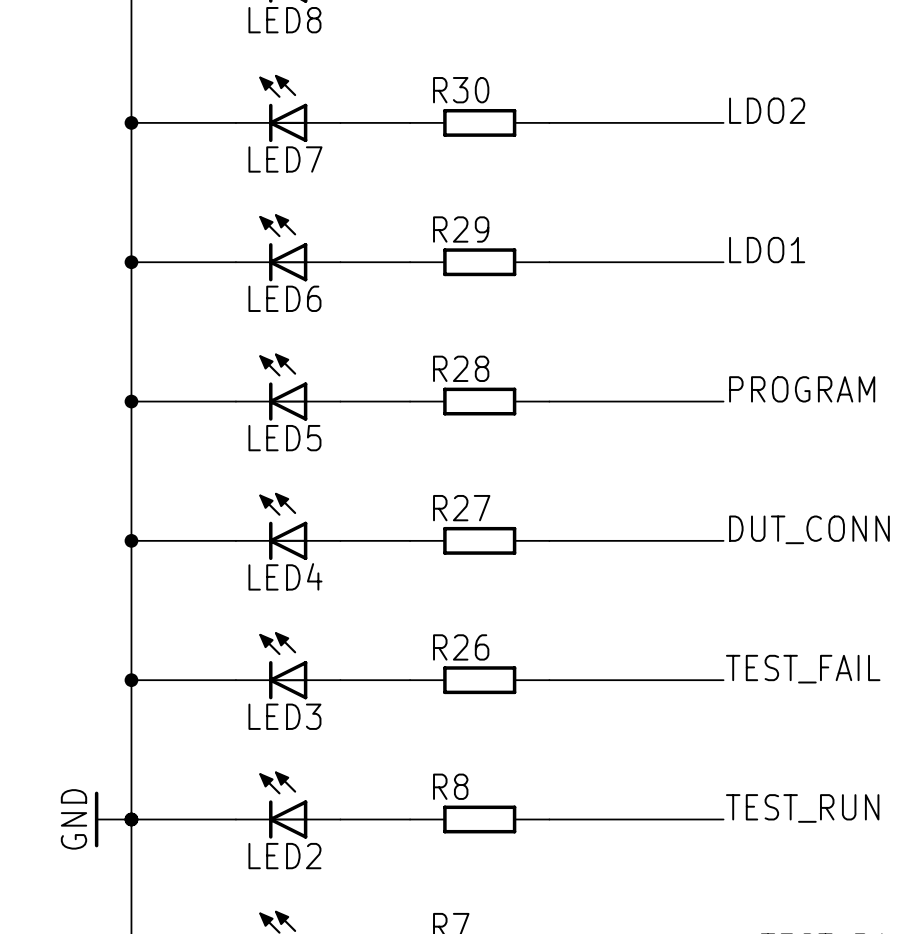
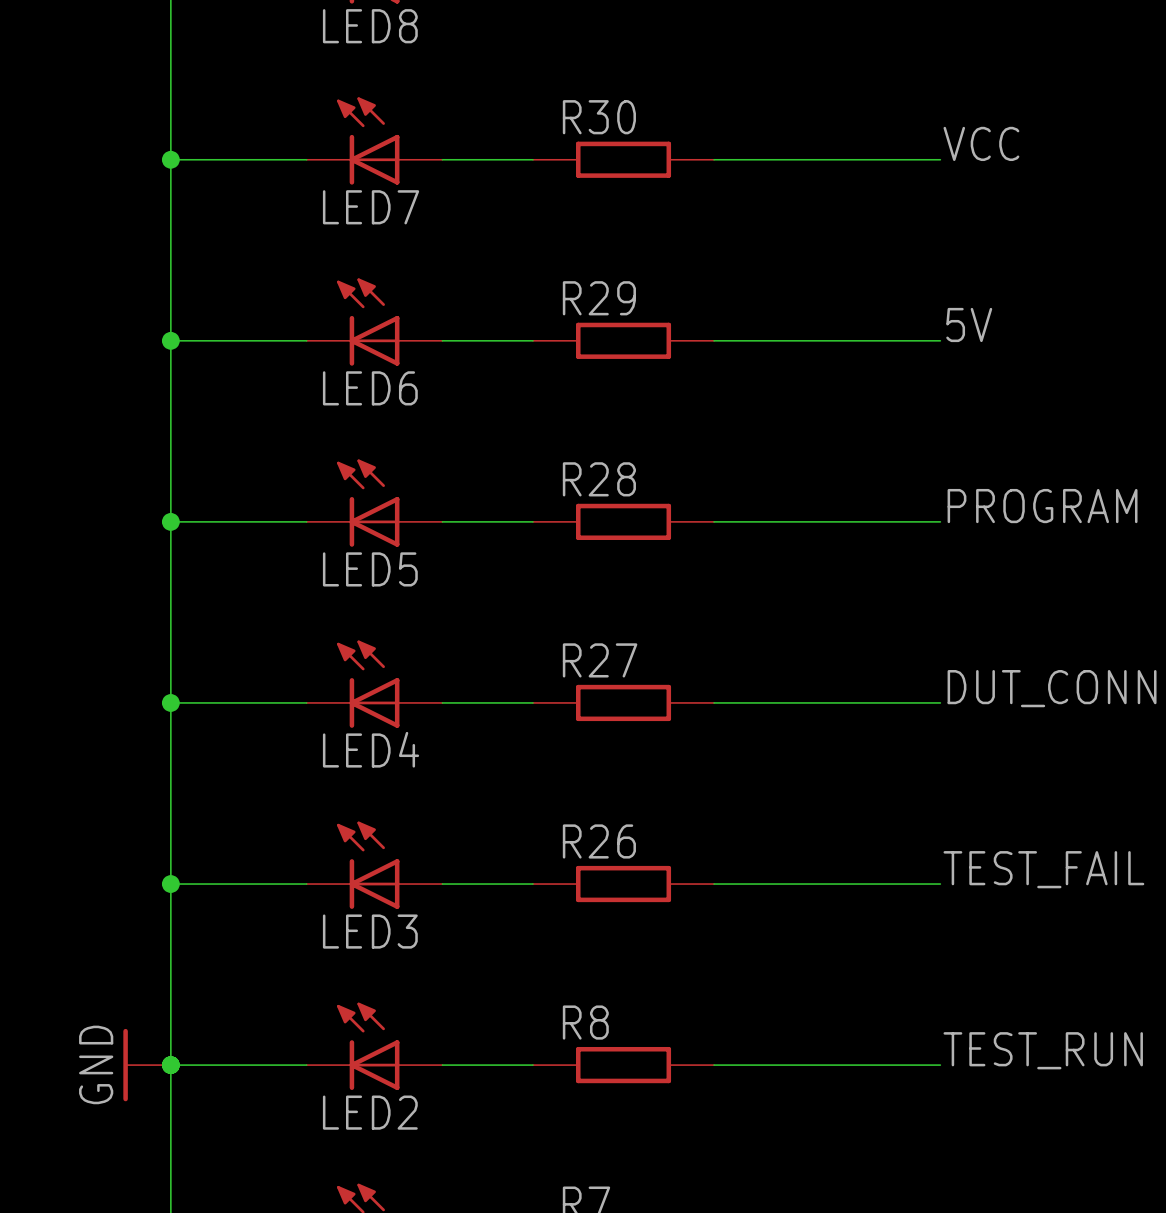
label: LDO2 (767, 110) -> VCC (981, 143)
label: LDO1 (767, 250) -> 5V (969, 324)

